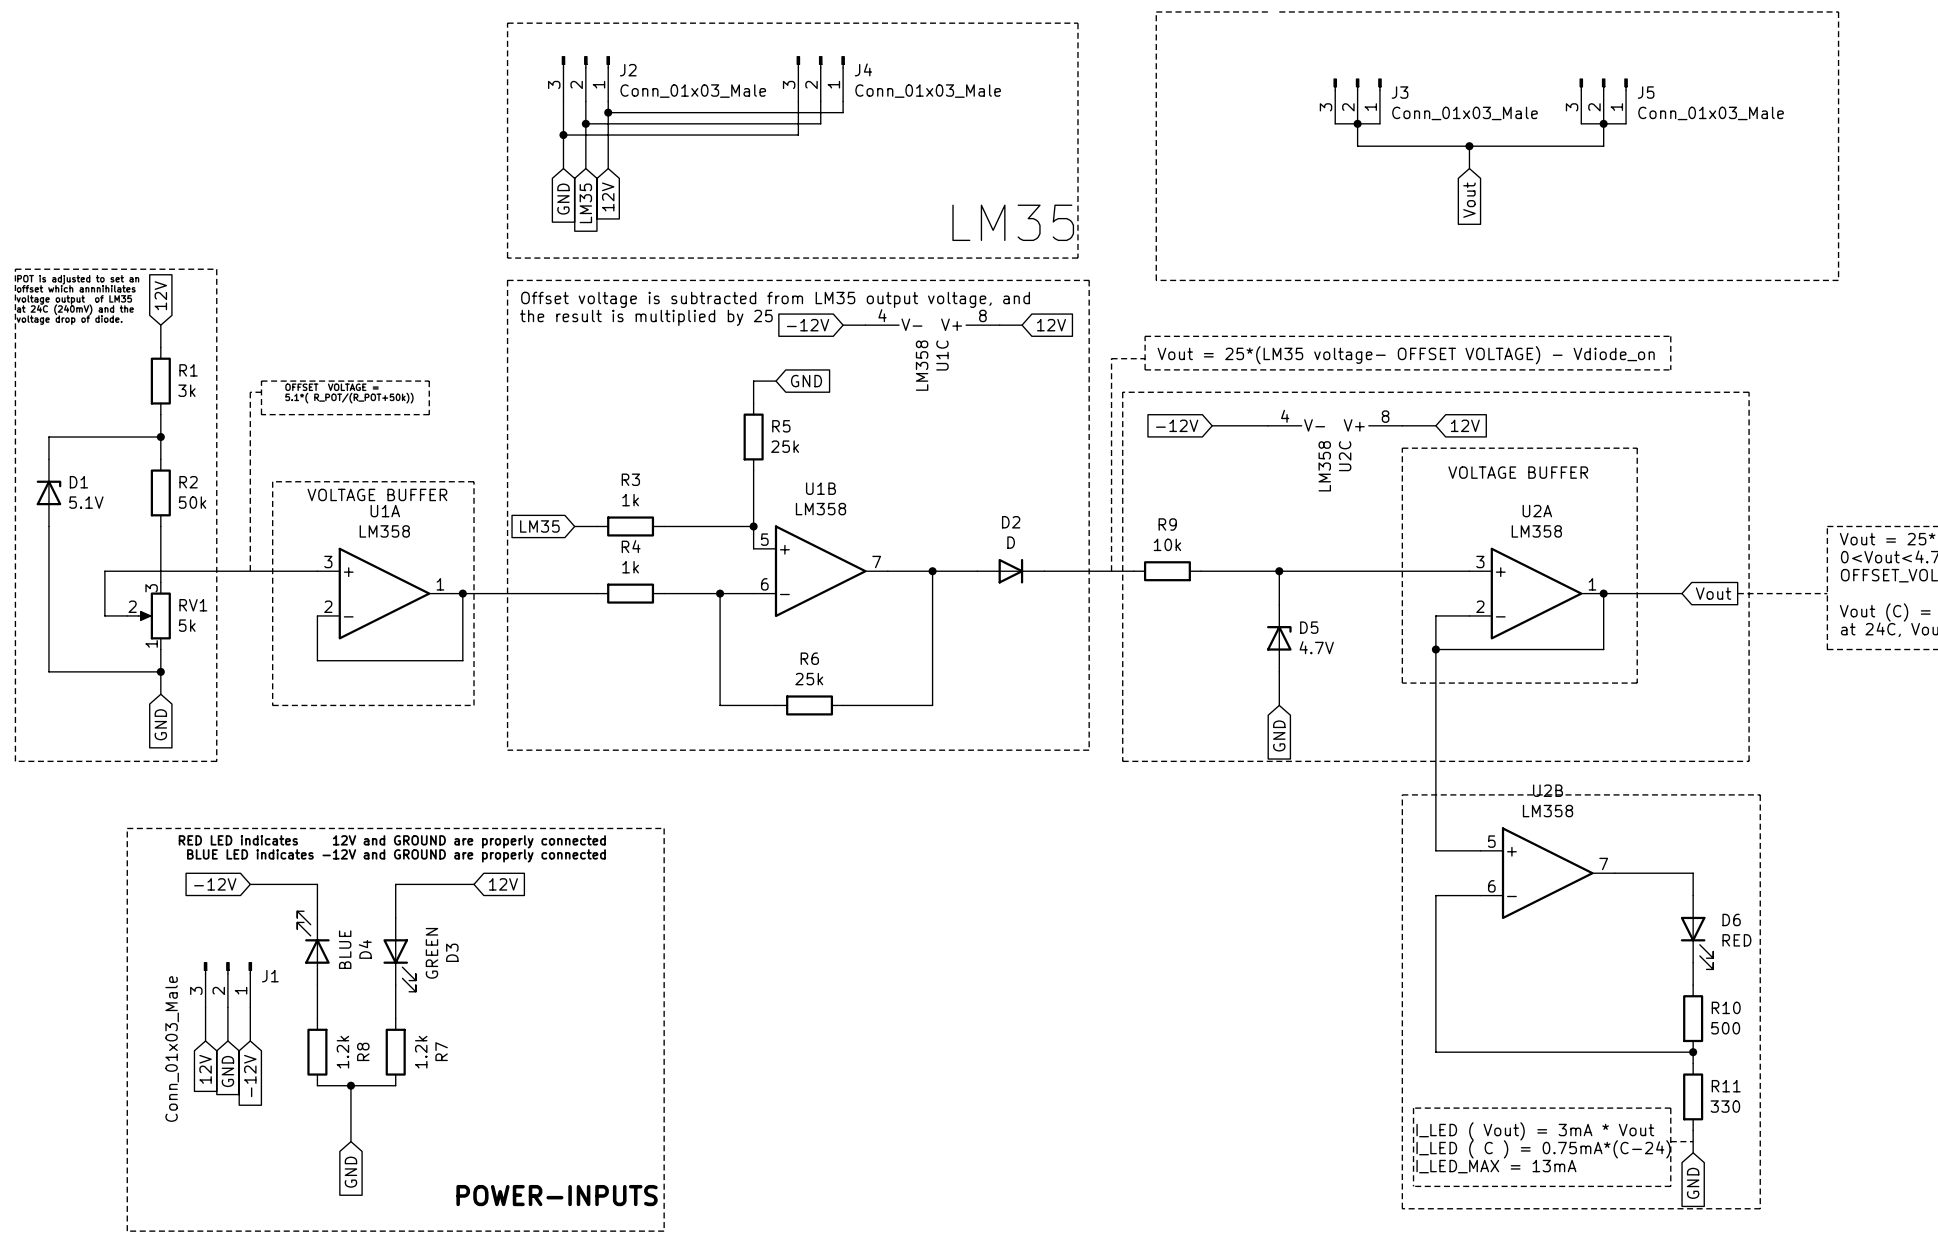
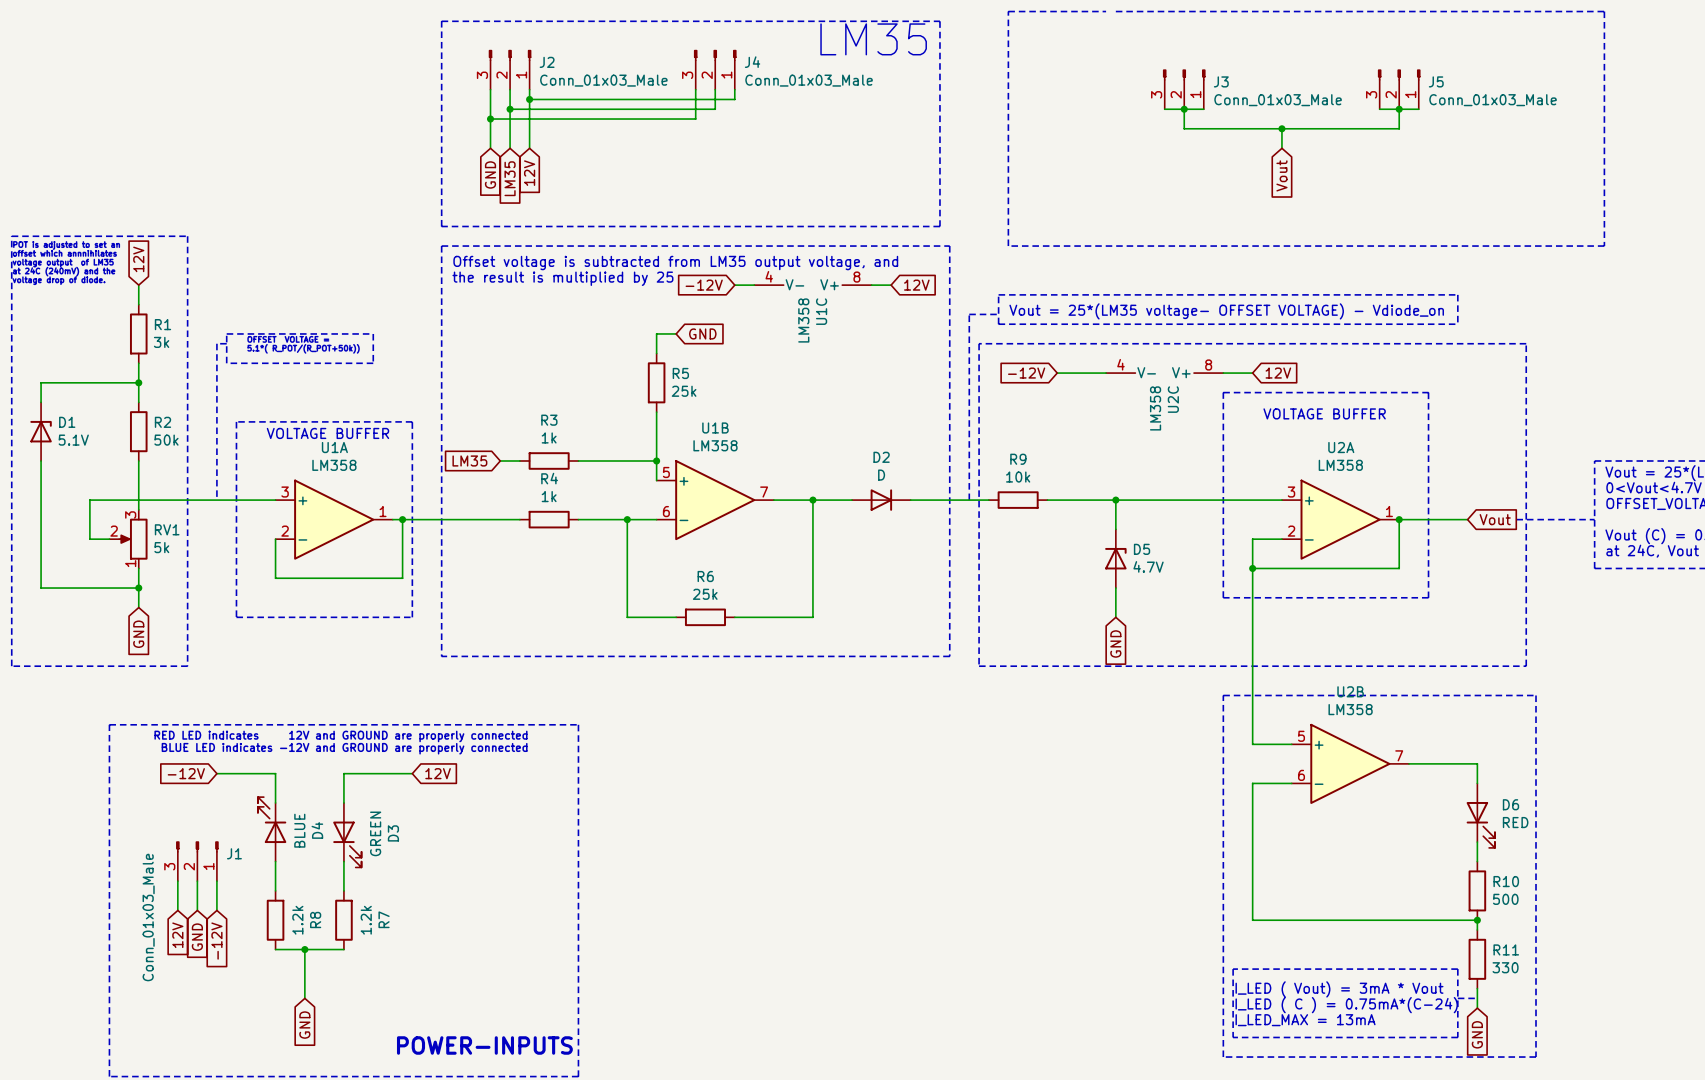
text position: LM35 (1013, 222) -> LM35 (873, 39)

